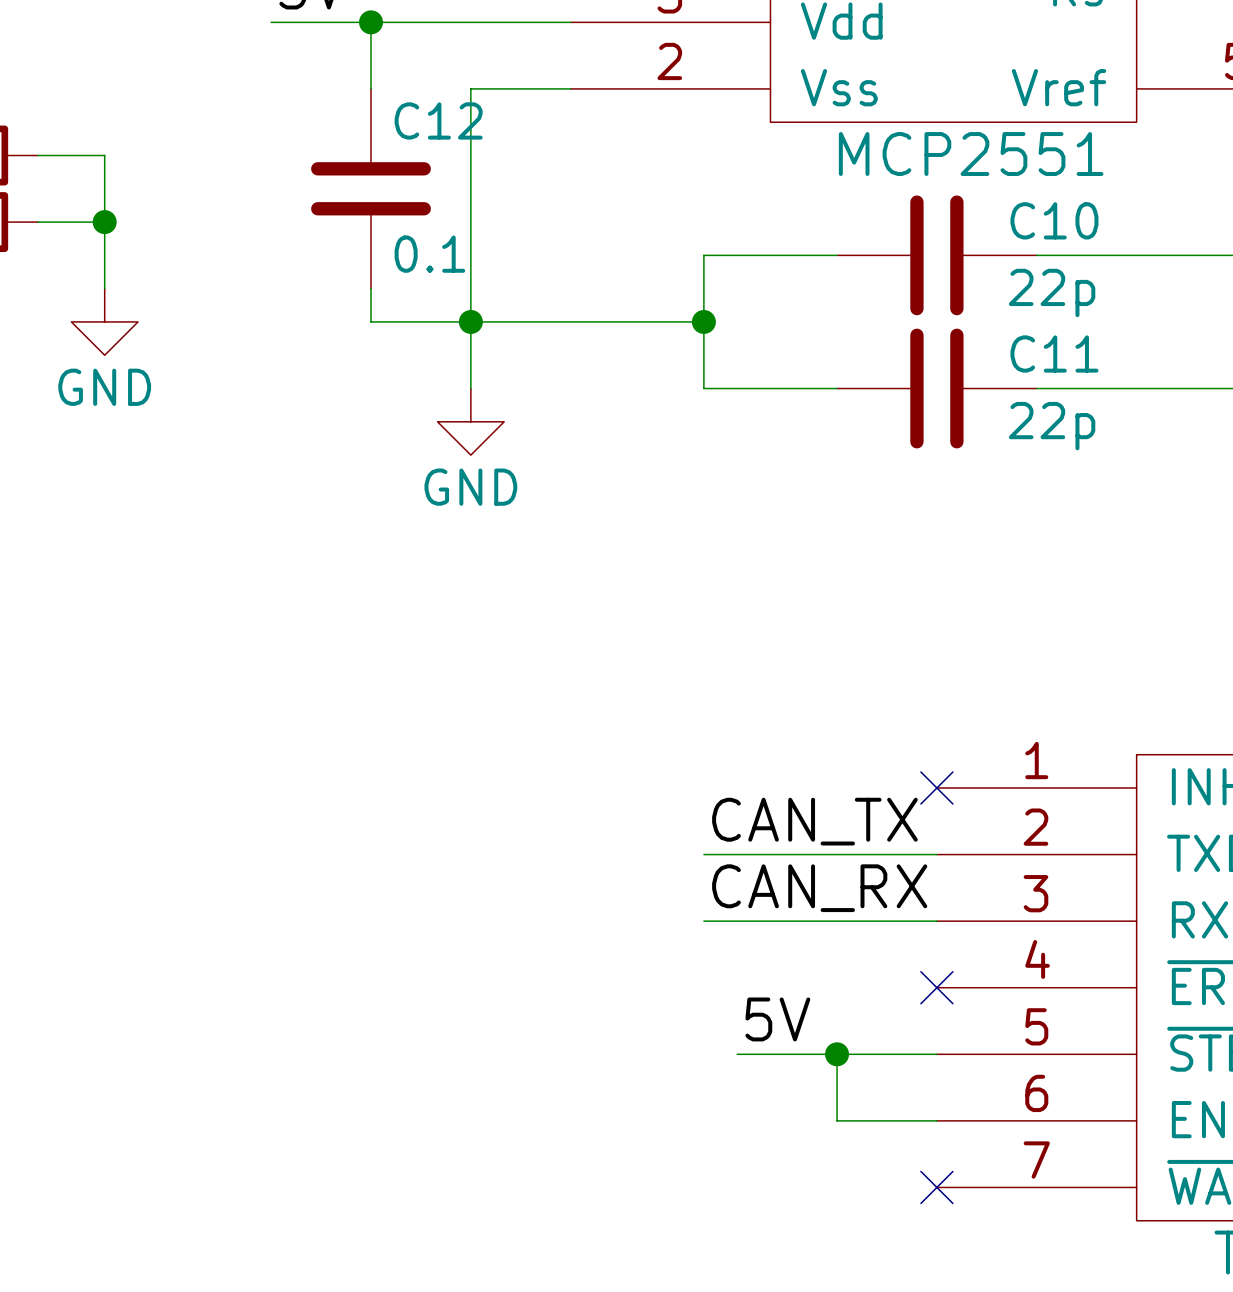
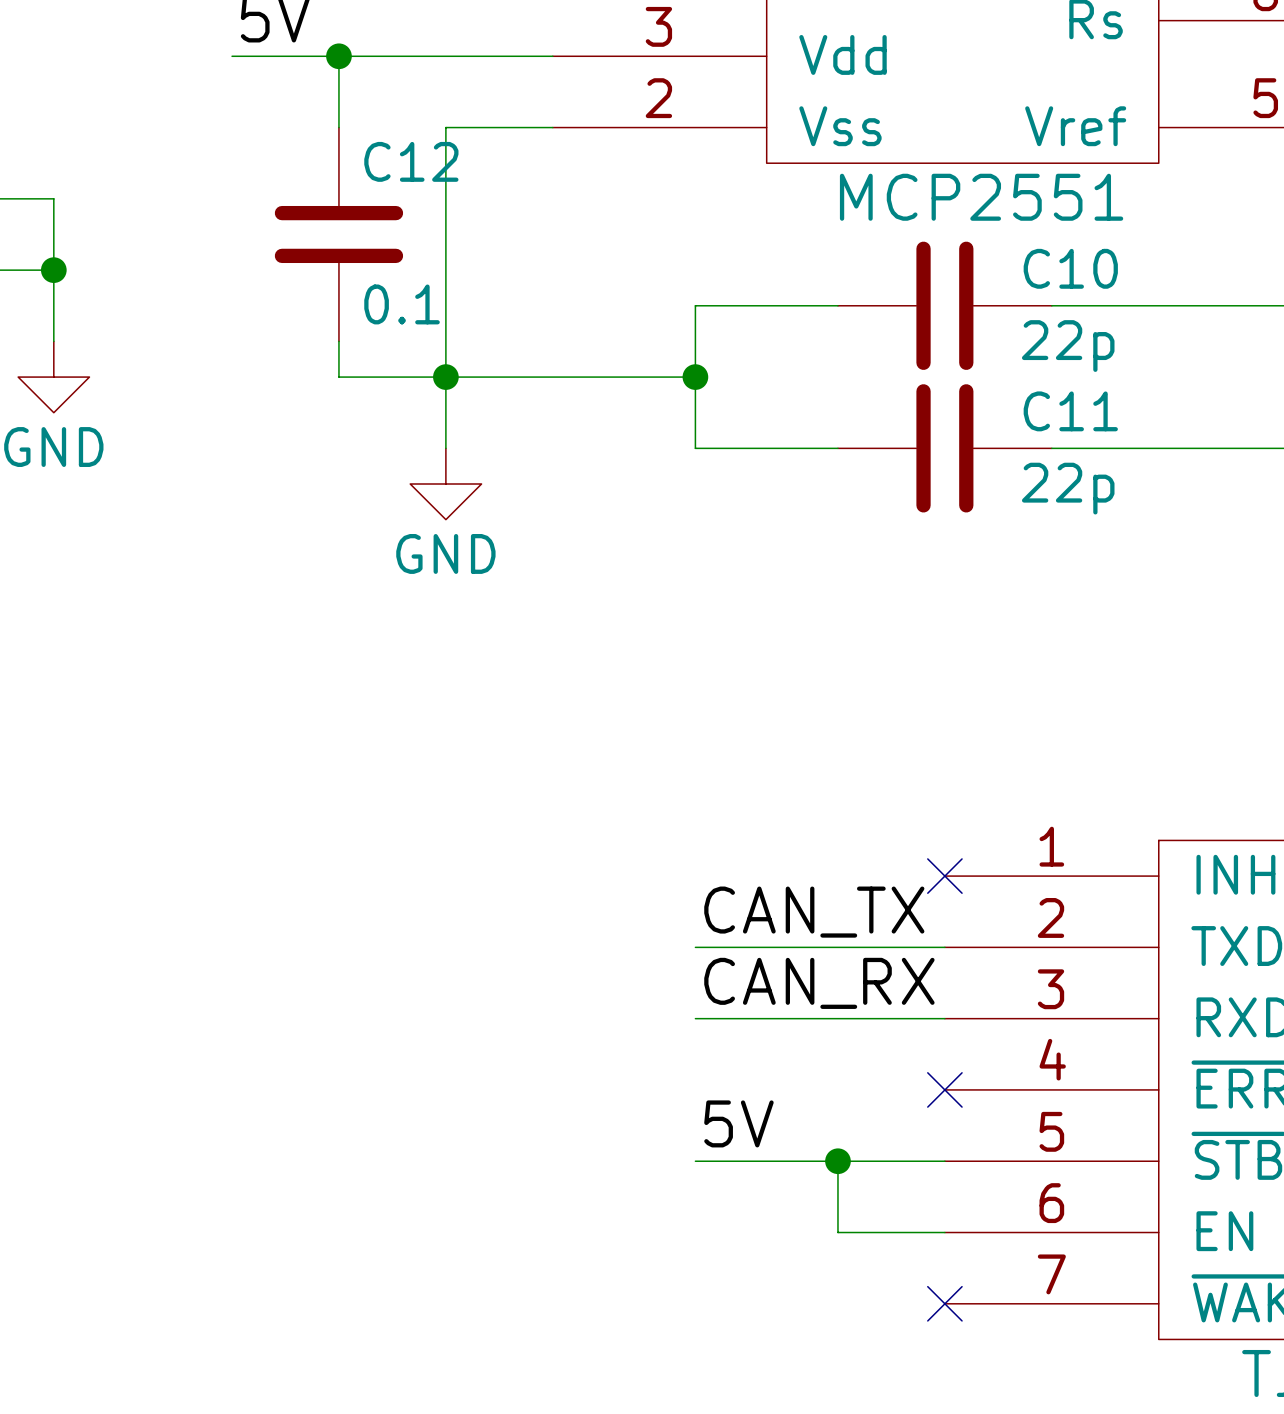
label position: 5V (777, 1019) -> 5V (738, 1123)
wire: none -> (695, 1161) (731, 1161)

